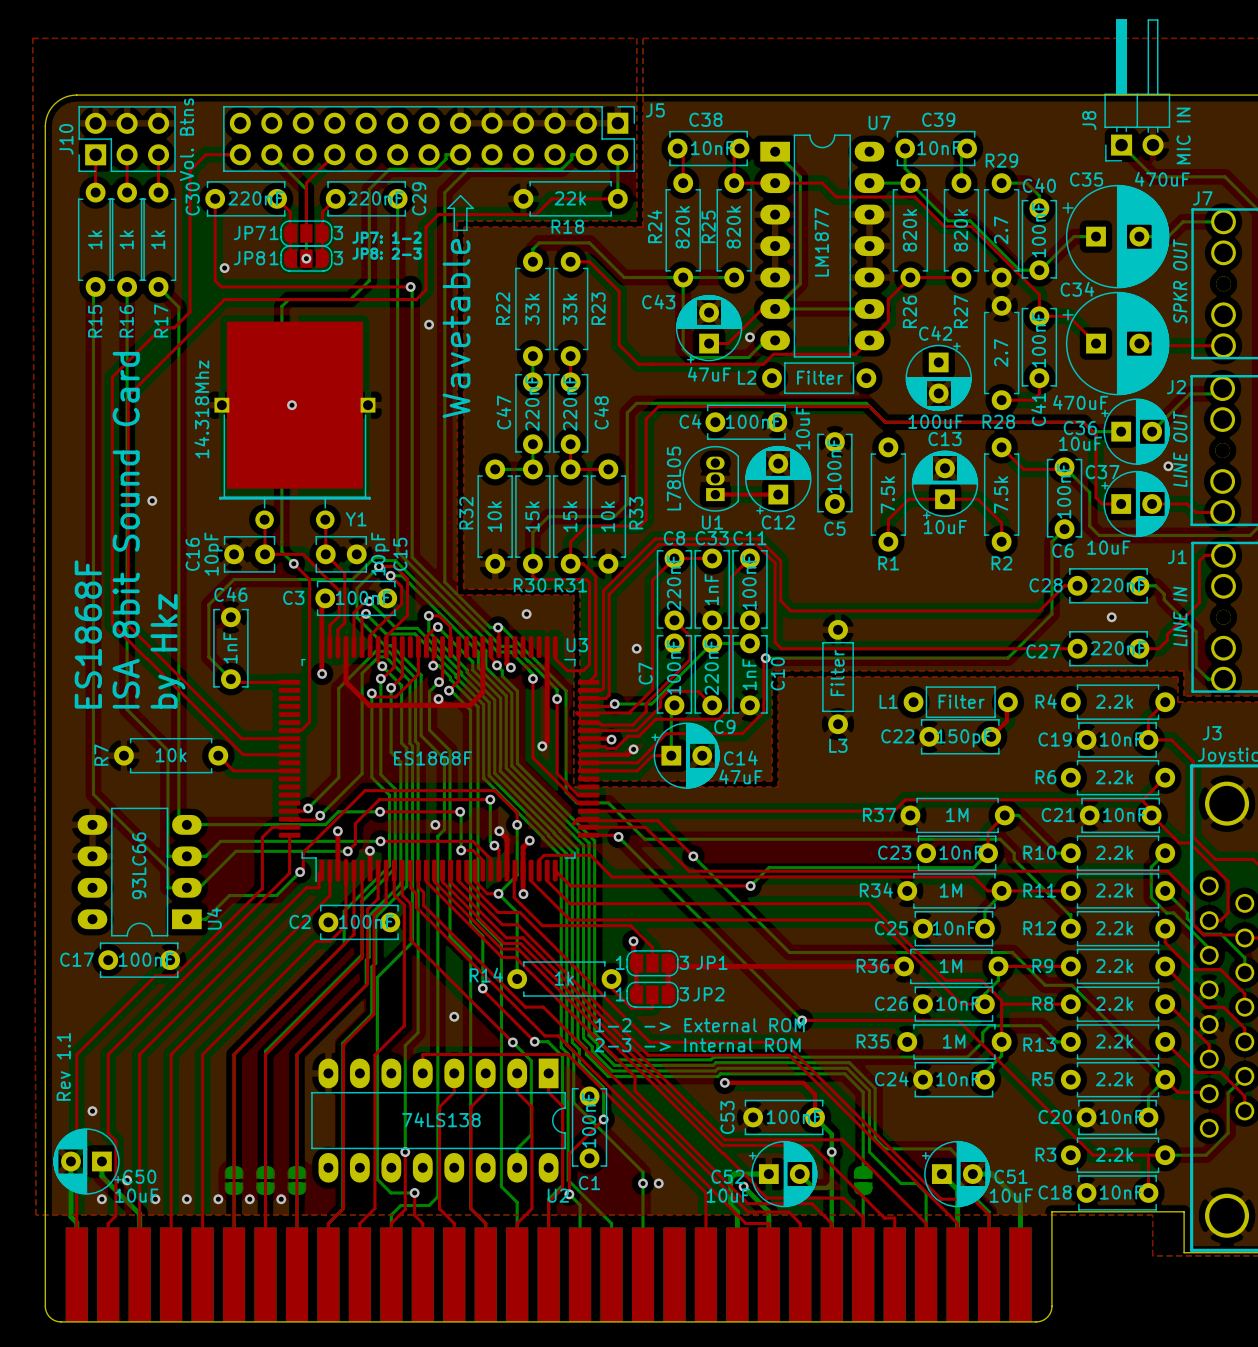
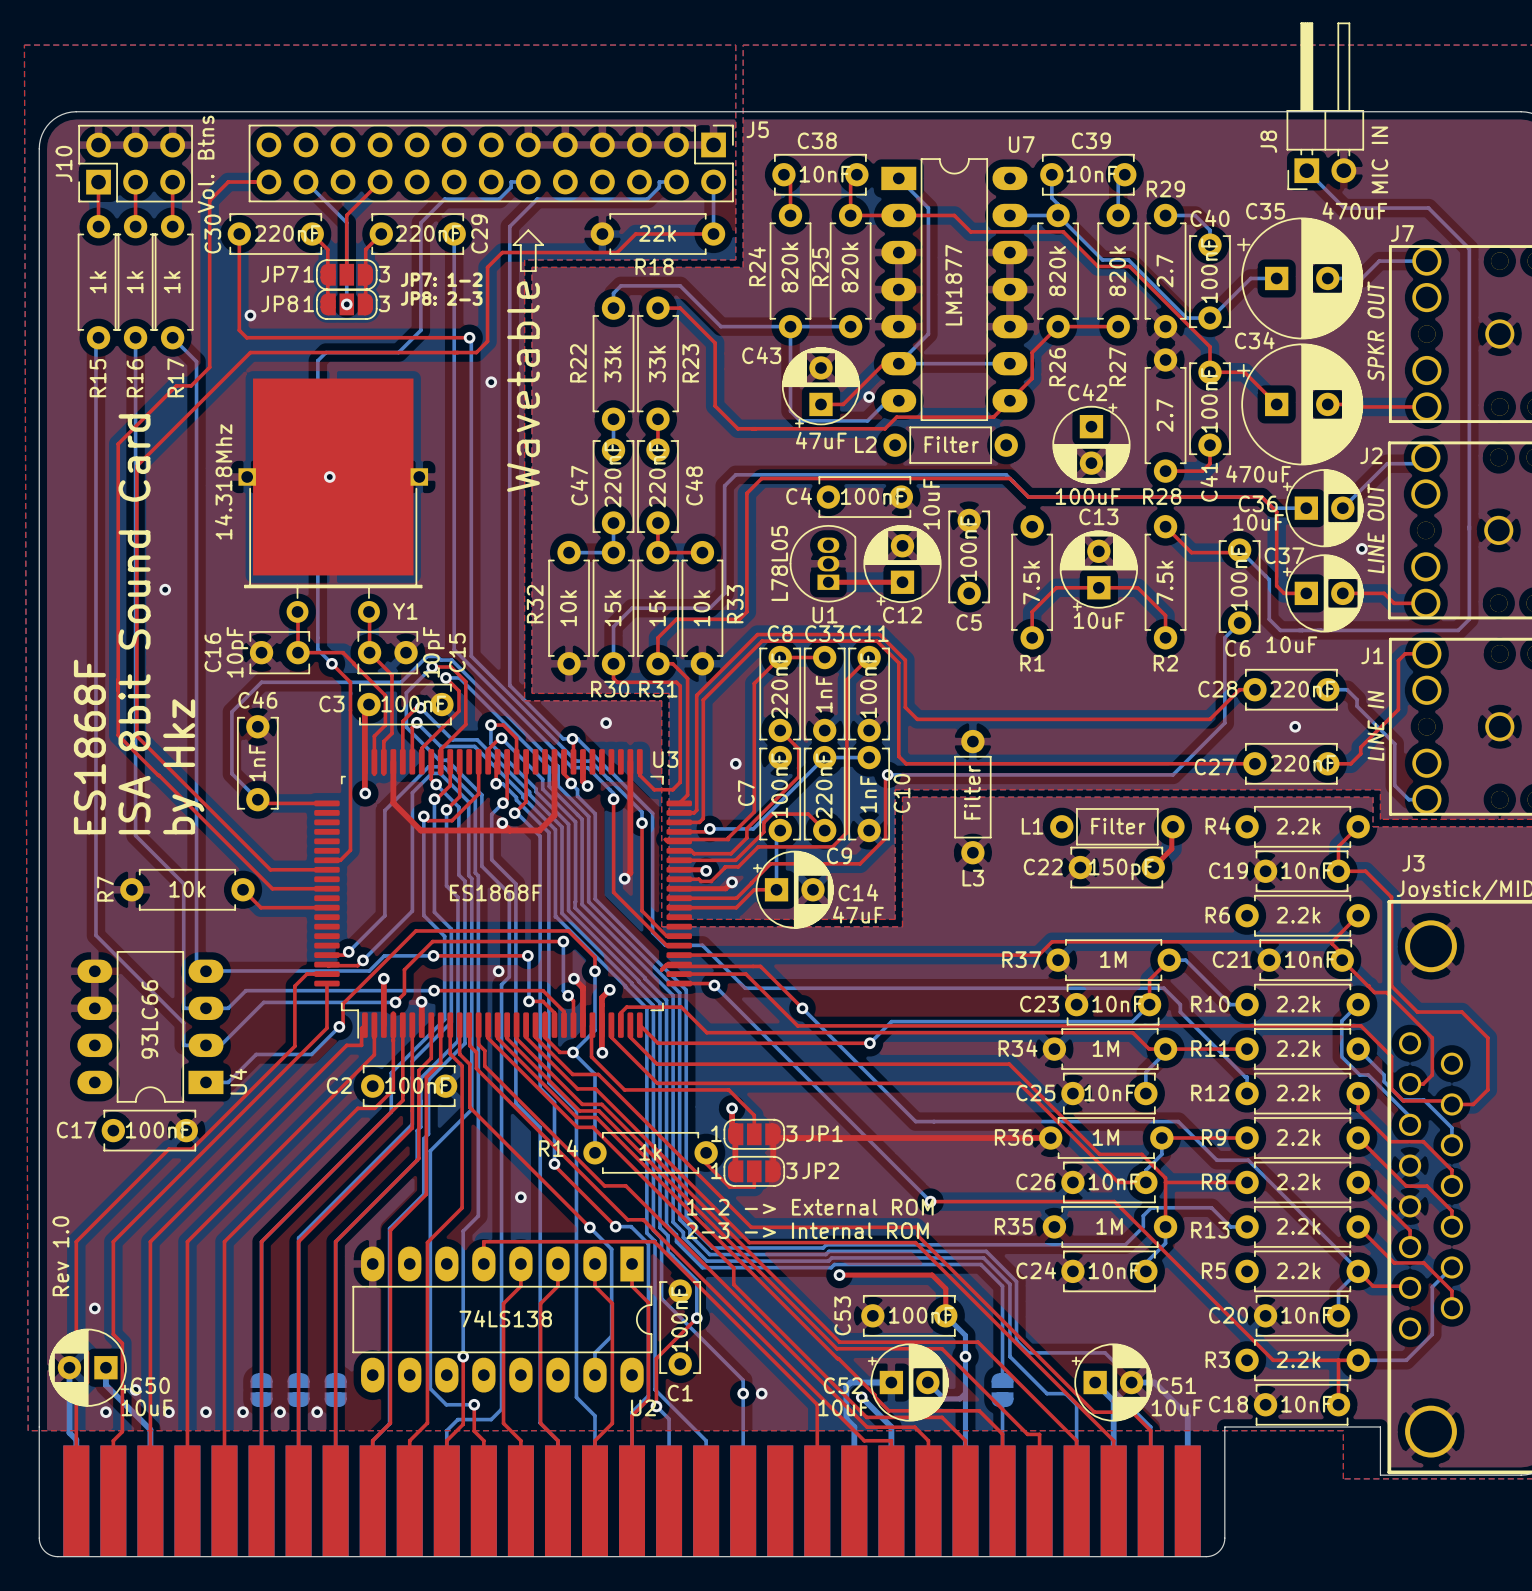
text: Rev 1.1 (63, 1066) -> Rev 1.0 (60, 1256)

